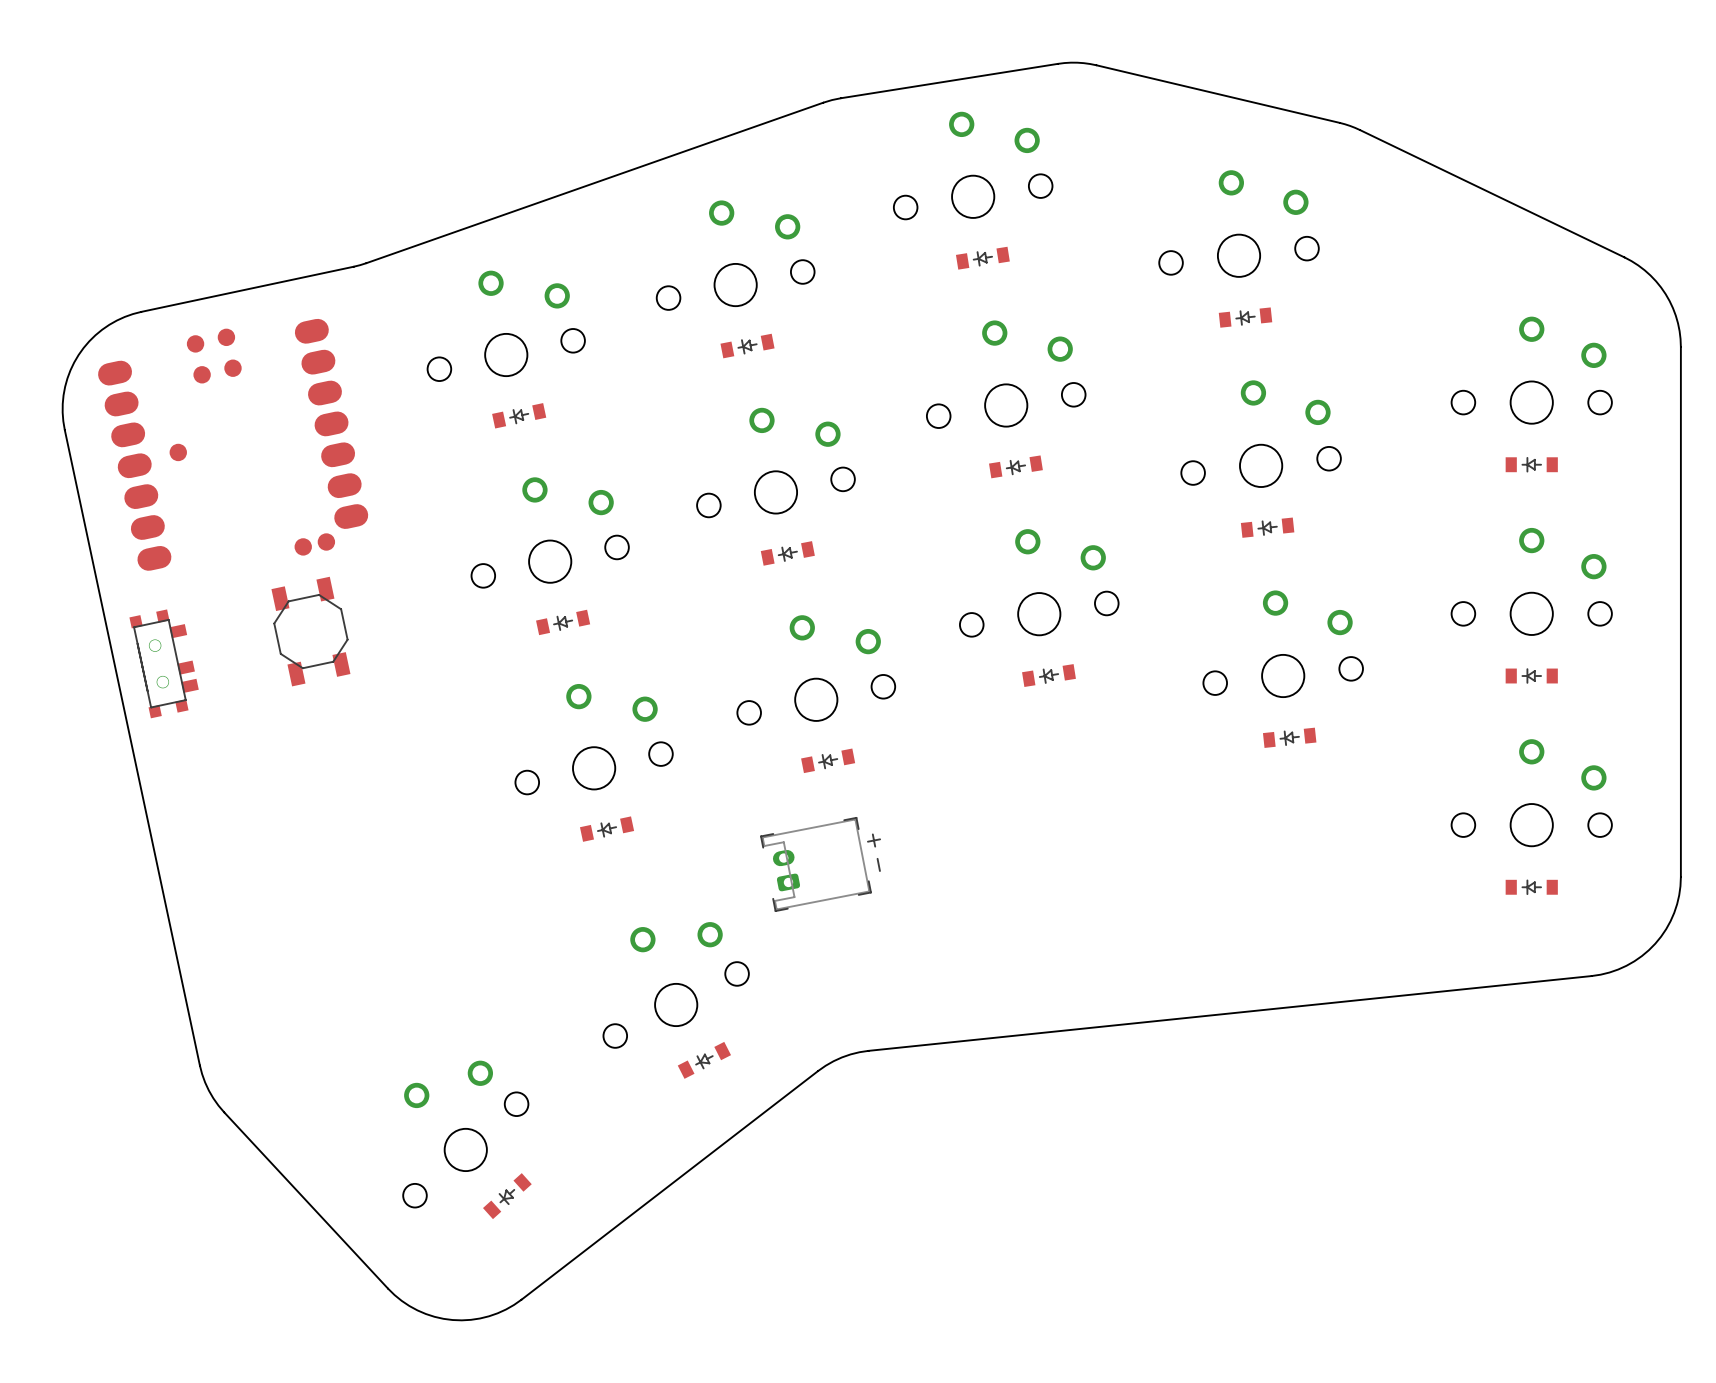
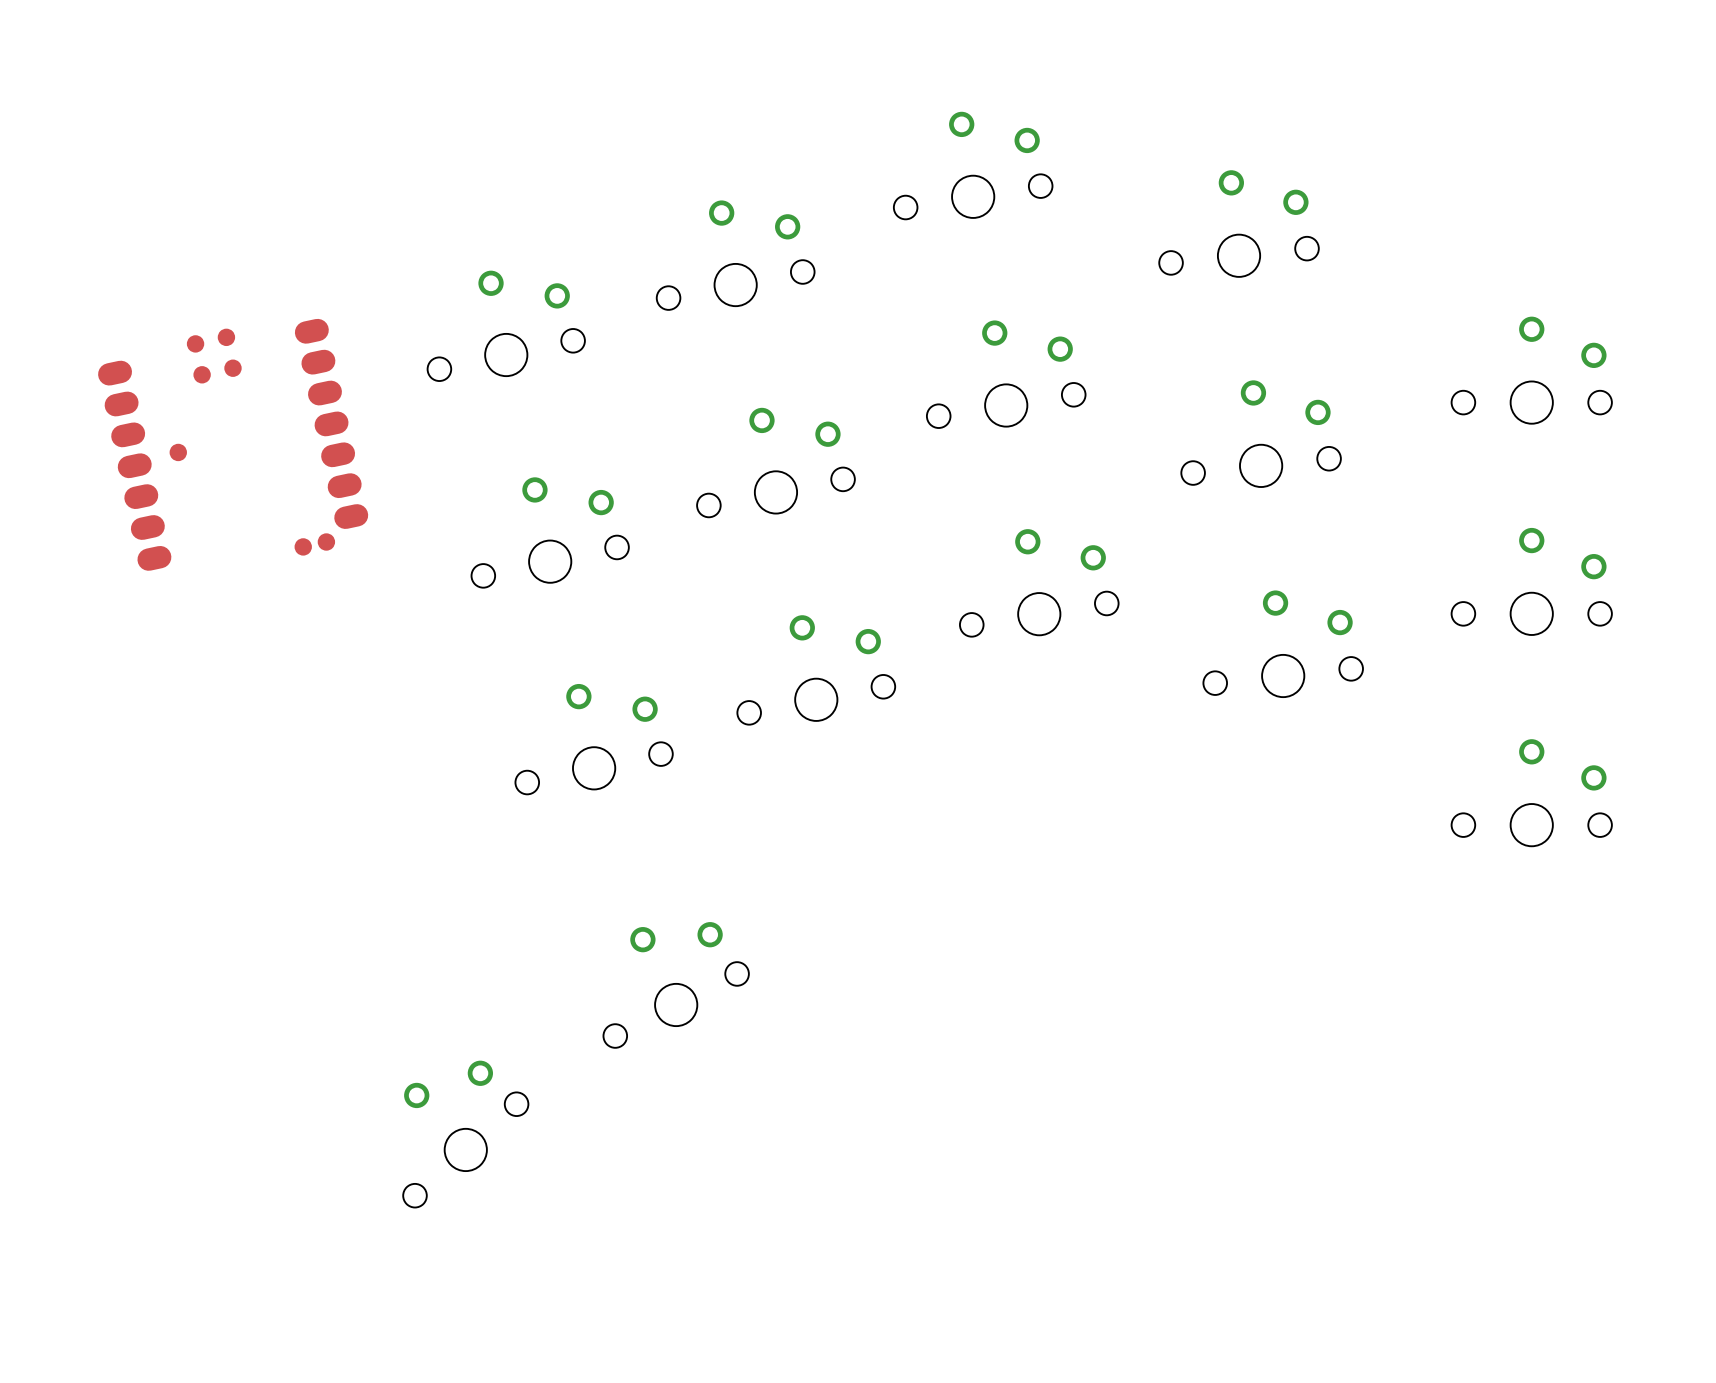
board edge: (1058, 63) (823, 102) (360, 265) (132, 314) (109, 324) (95, 335) (83, 347) (74, 362) (67, 378) (63, 395) (62, 412) (64, 429) (199, 1065) (205, 1082) (213, 1098) (224, 1112) (388, 1288) (401, 1300) (417, 1310) (443, 1318) (471, 1319) (489, 1316) (514, 1304) (818, 1071) (833, 1061) (850, 1054) (868, 1050) (1600, 974) (1626, 965) (1641, 956) (1661, 936) (1670, 921) (1679, 895) (1680, 877) (1680, 347) (1675, 315) (1661, 287) (1644, 270) (1624, 257) (1350, 125) (1096, 65) (1077, 62) (1058, 63) -> none
part: (982, 258) -> none
part: (1245, 317) -> none
part: (747, 346) -> none
part: (519, 415) -> none
part: (1531, 464) -> none
part: (1015, 466) -> none
part: (1267, 527) -> none
part: (787, 553) -> none
part: (563, 622) -> none
part: (310, 631) -> none
part: (164, 663) -> none
part: (1048, 675) -> none
part: (1531, 676) -> none
part: (1289, 737) -> none
part: (828, 760) -> none
part: (607, 829) -> none
part: (820, 864) -> none
part: (1531, 887) -> none
part: (704, 1060) -> none
part: (507, 1196) -> none

